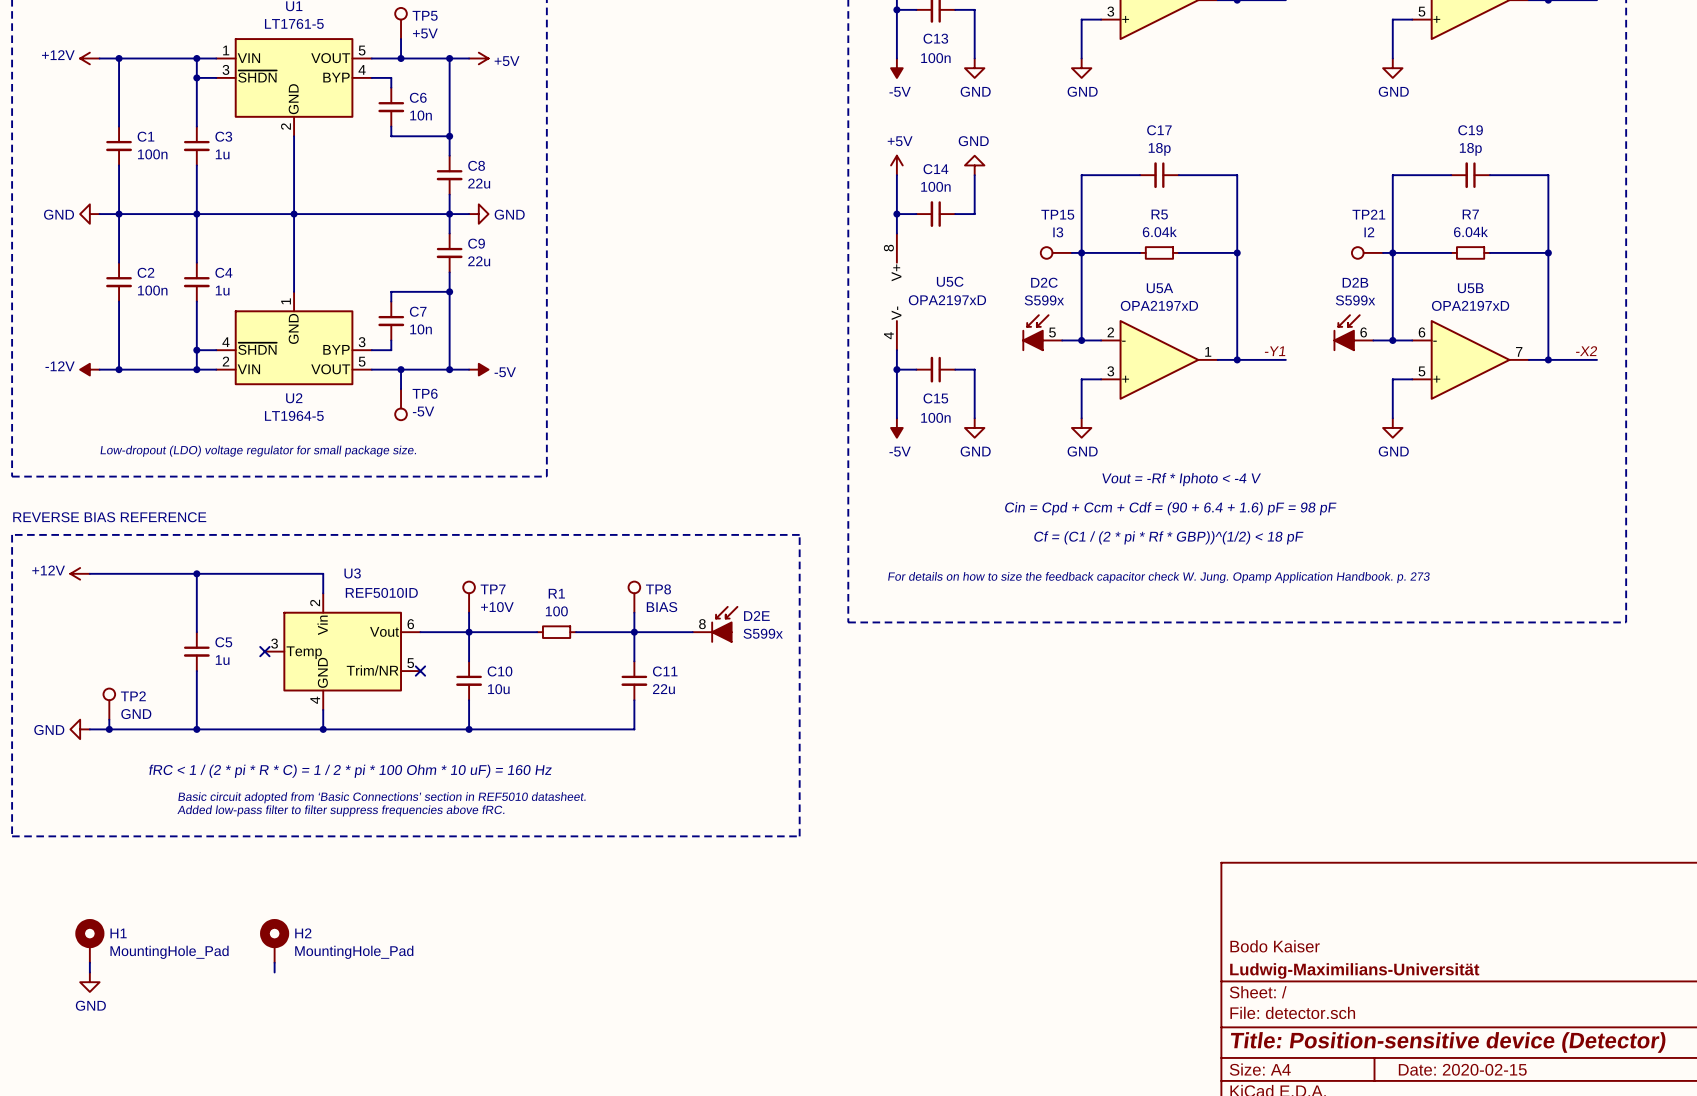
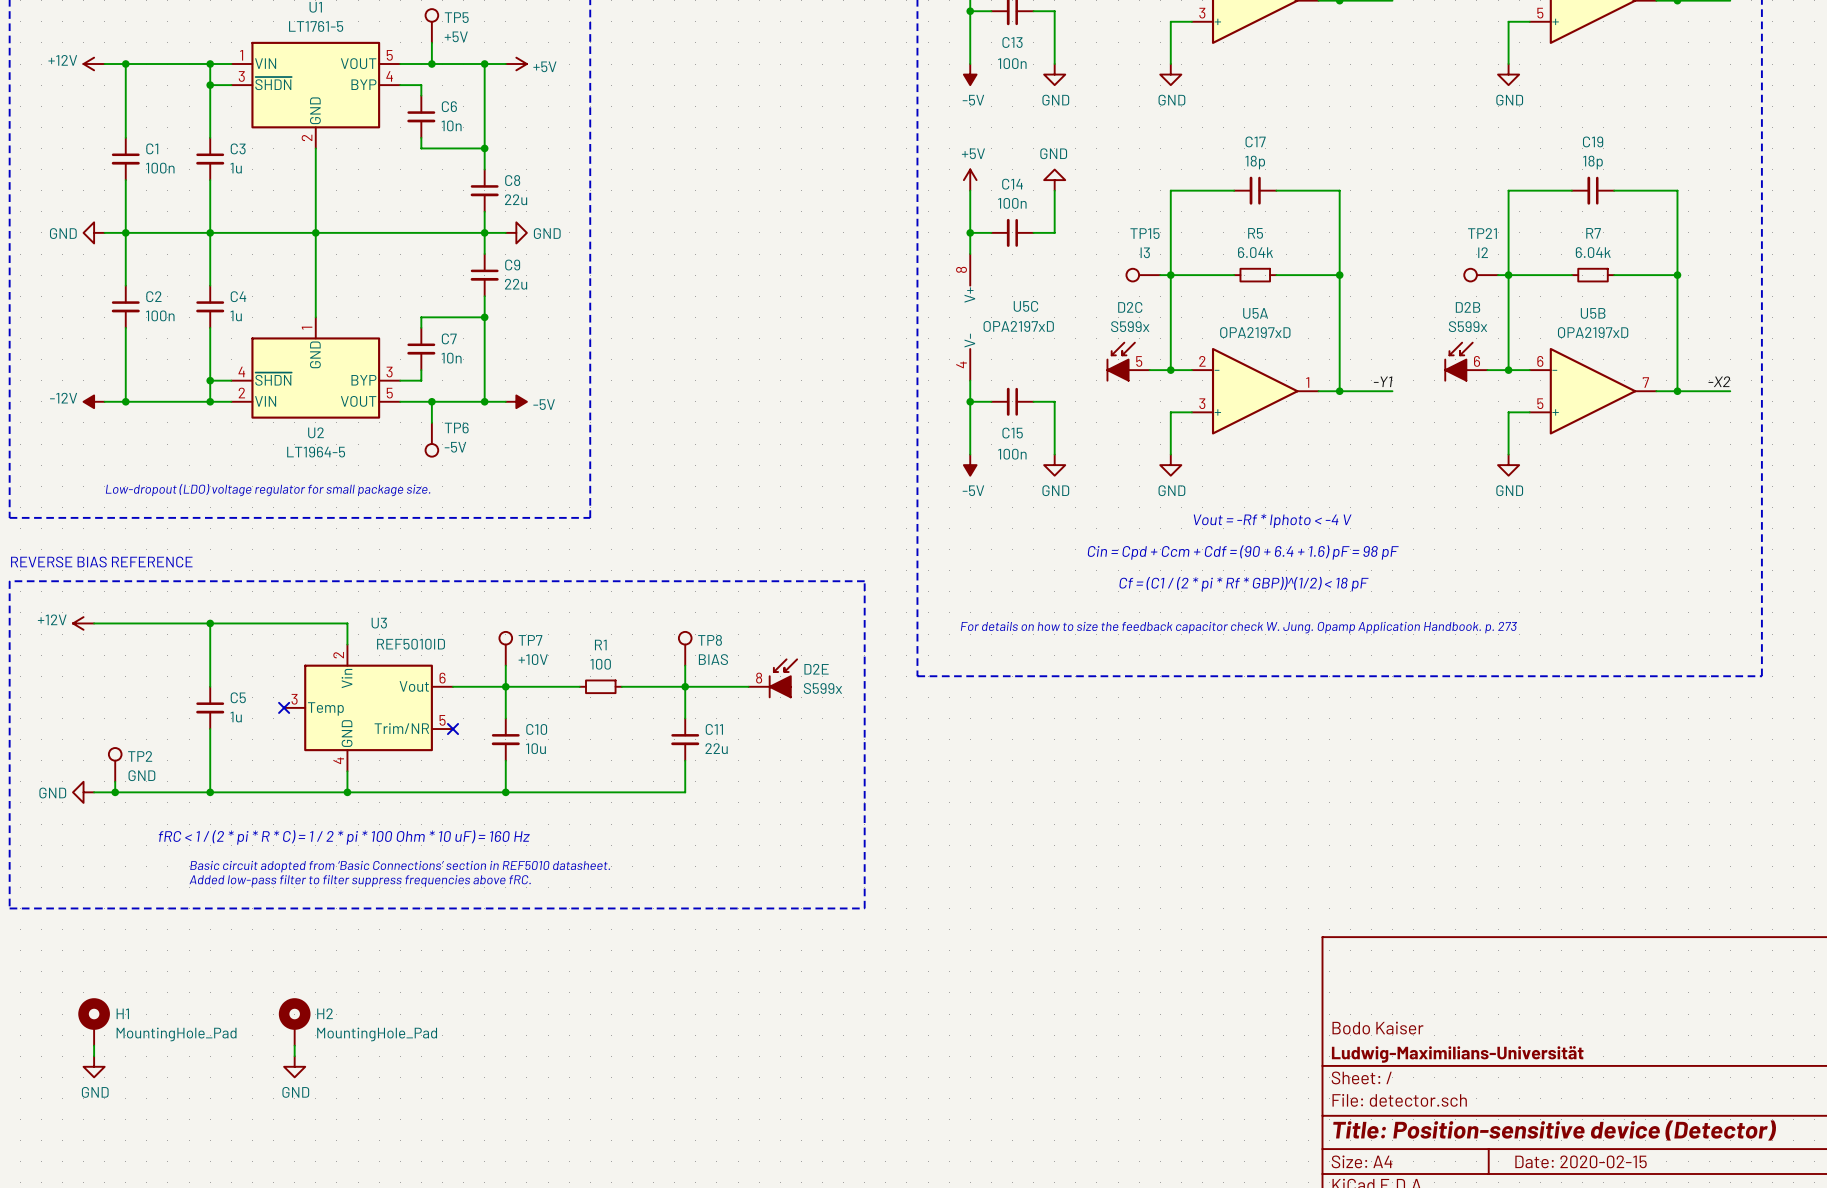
power symbol: none -> GND (294, 1066)

